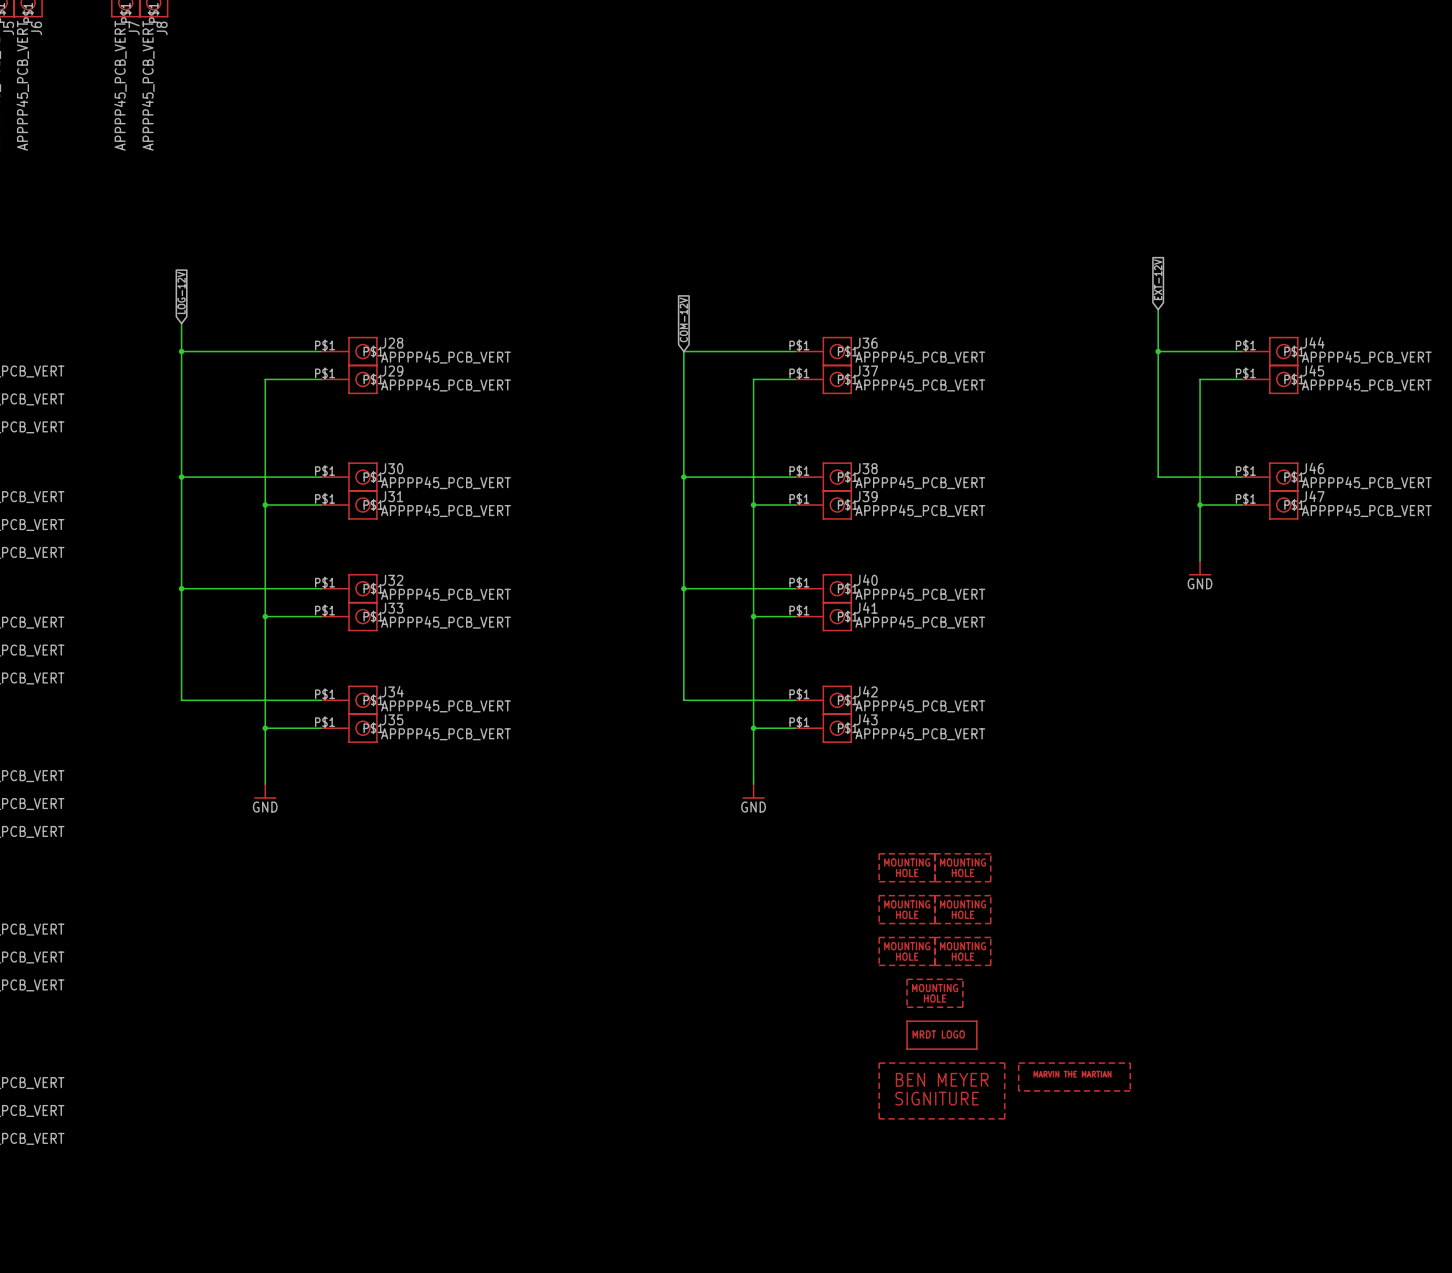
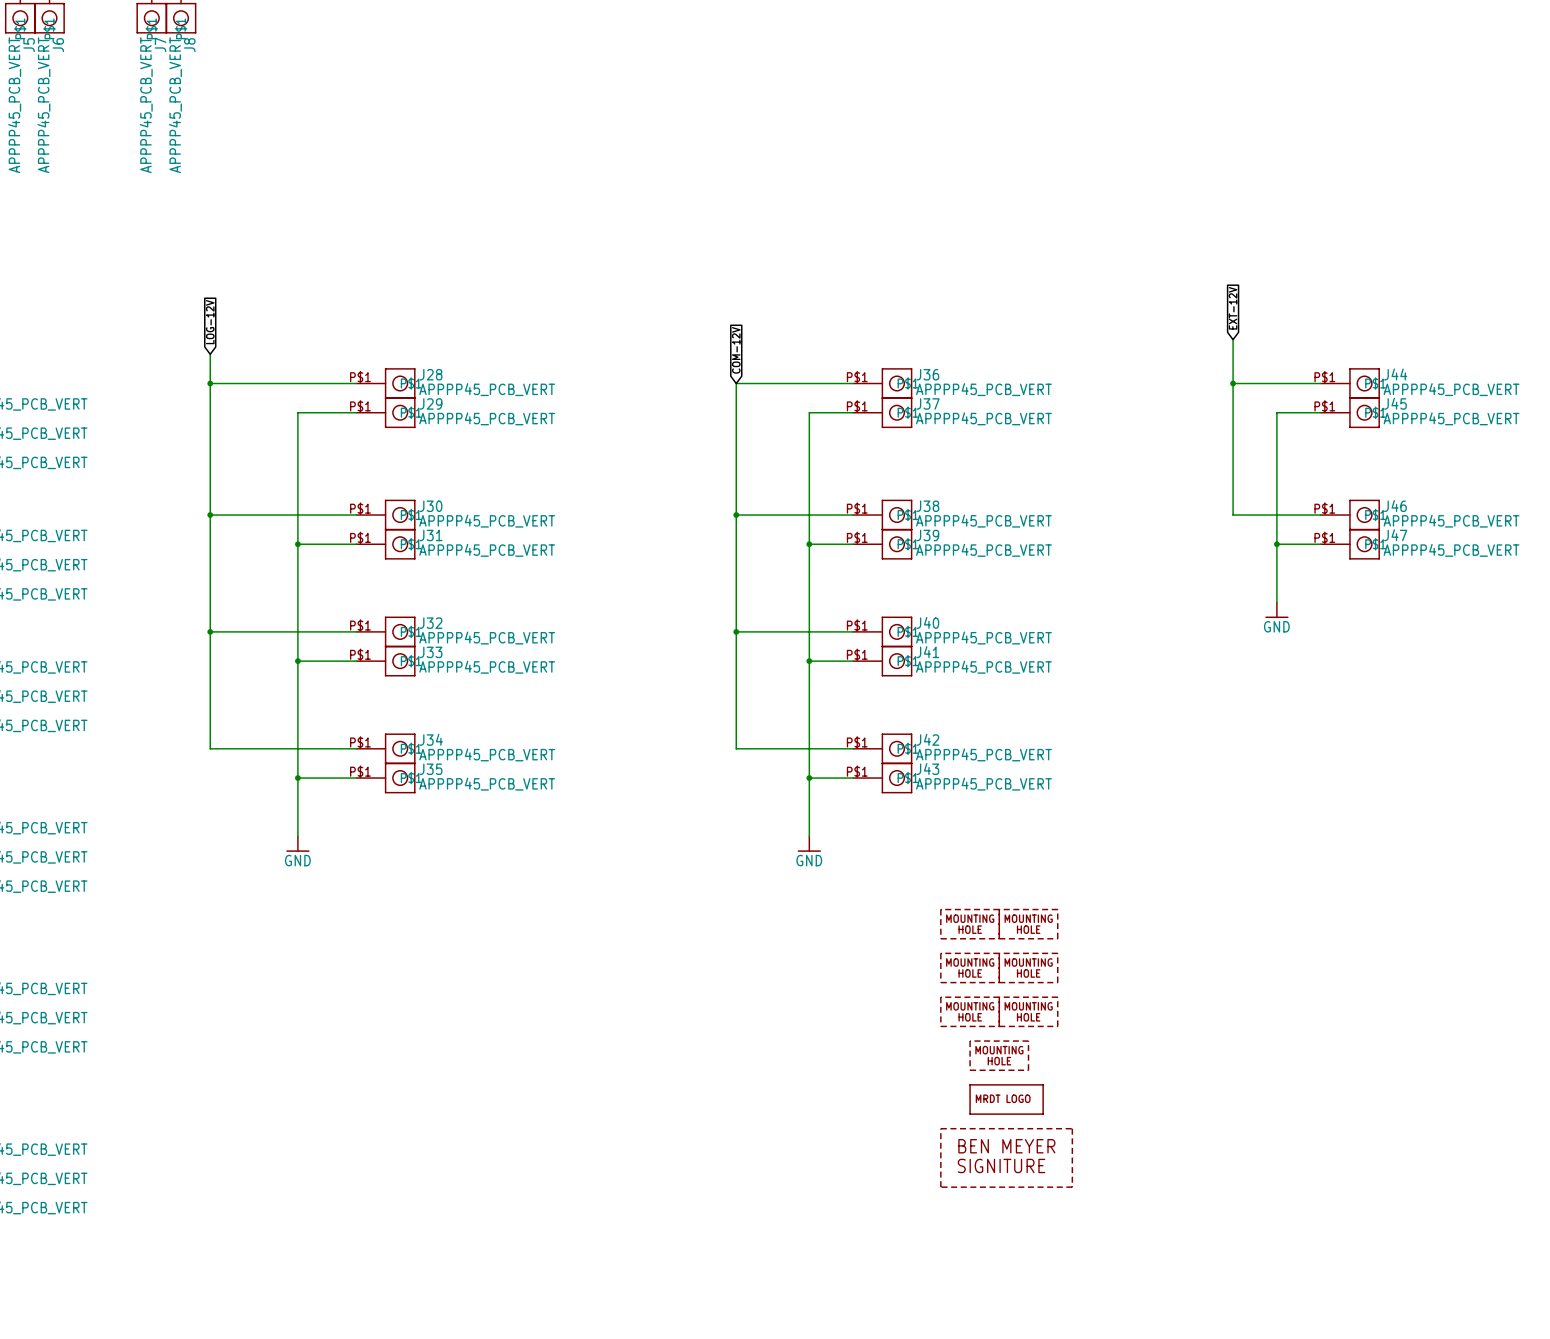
part: (1074, 1077) -> none

